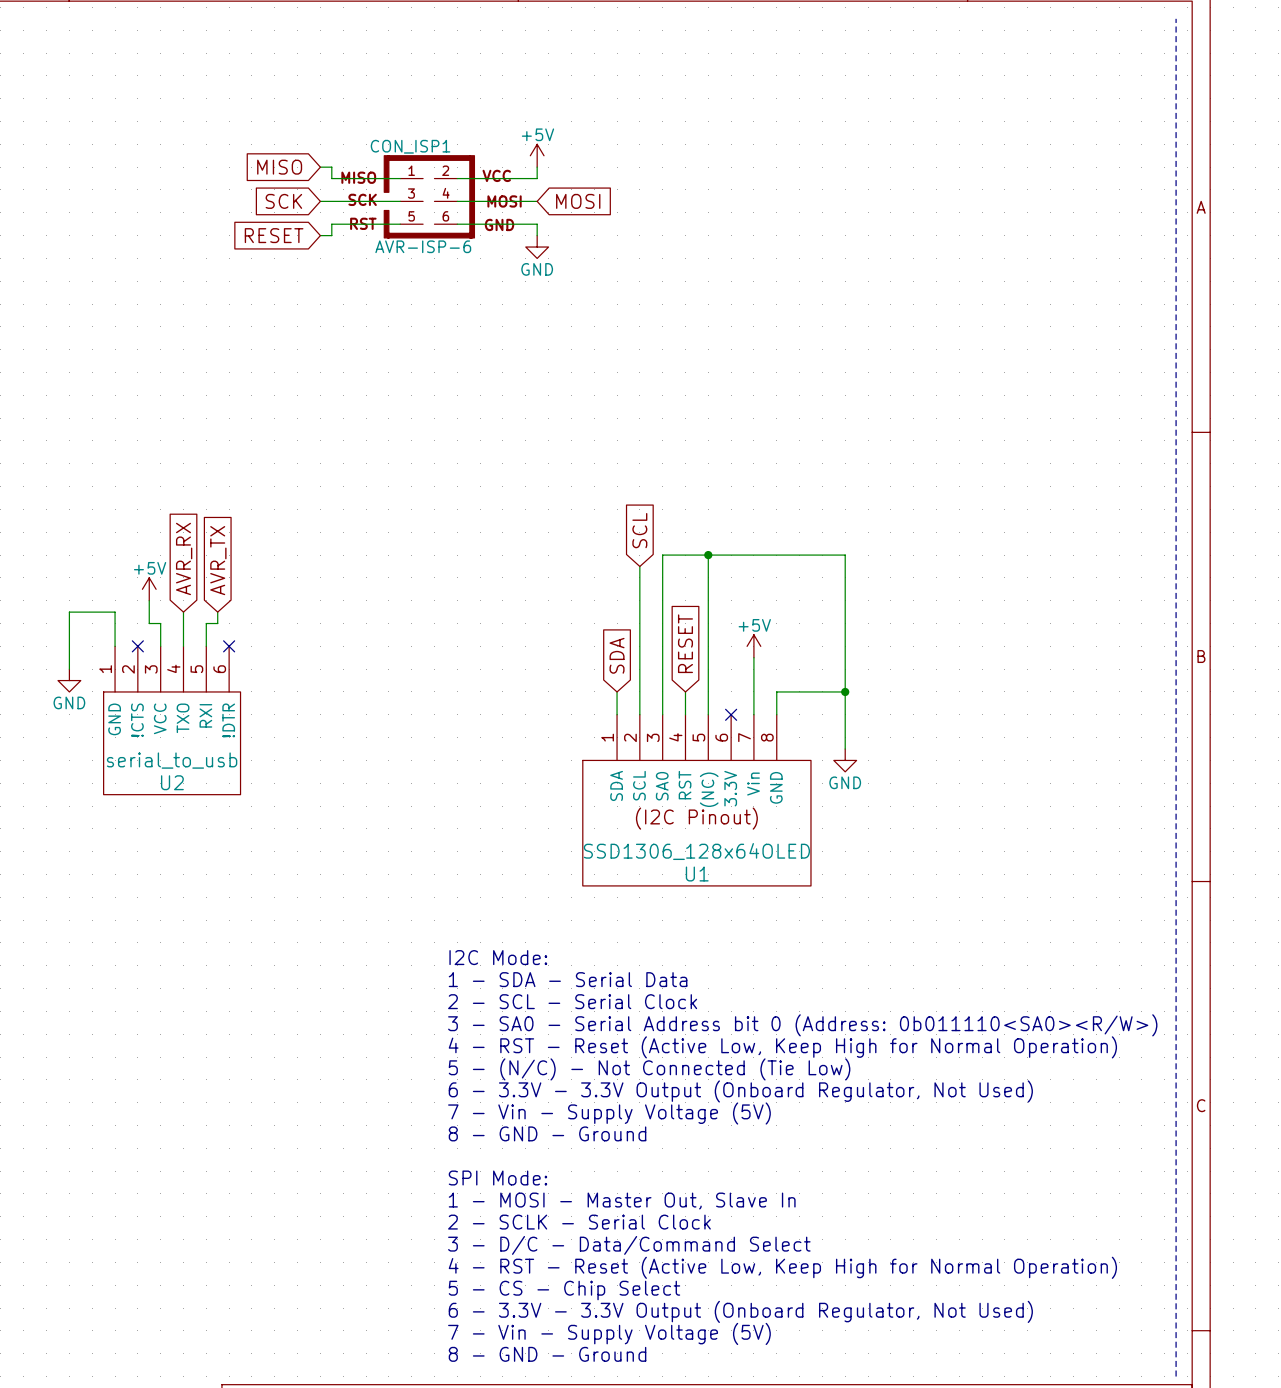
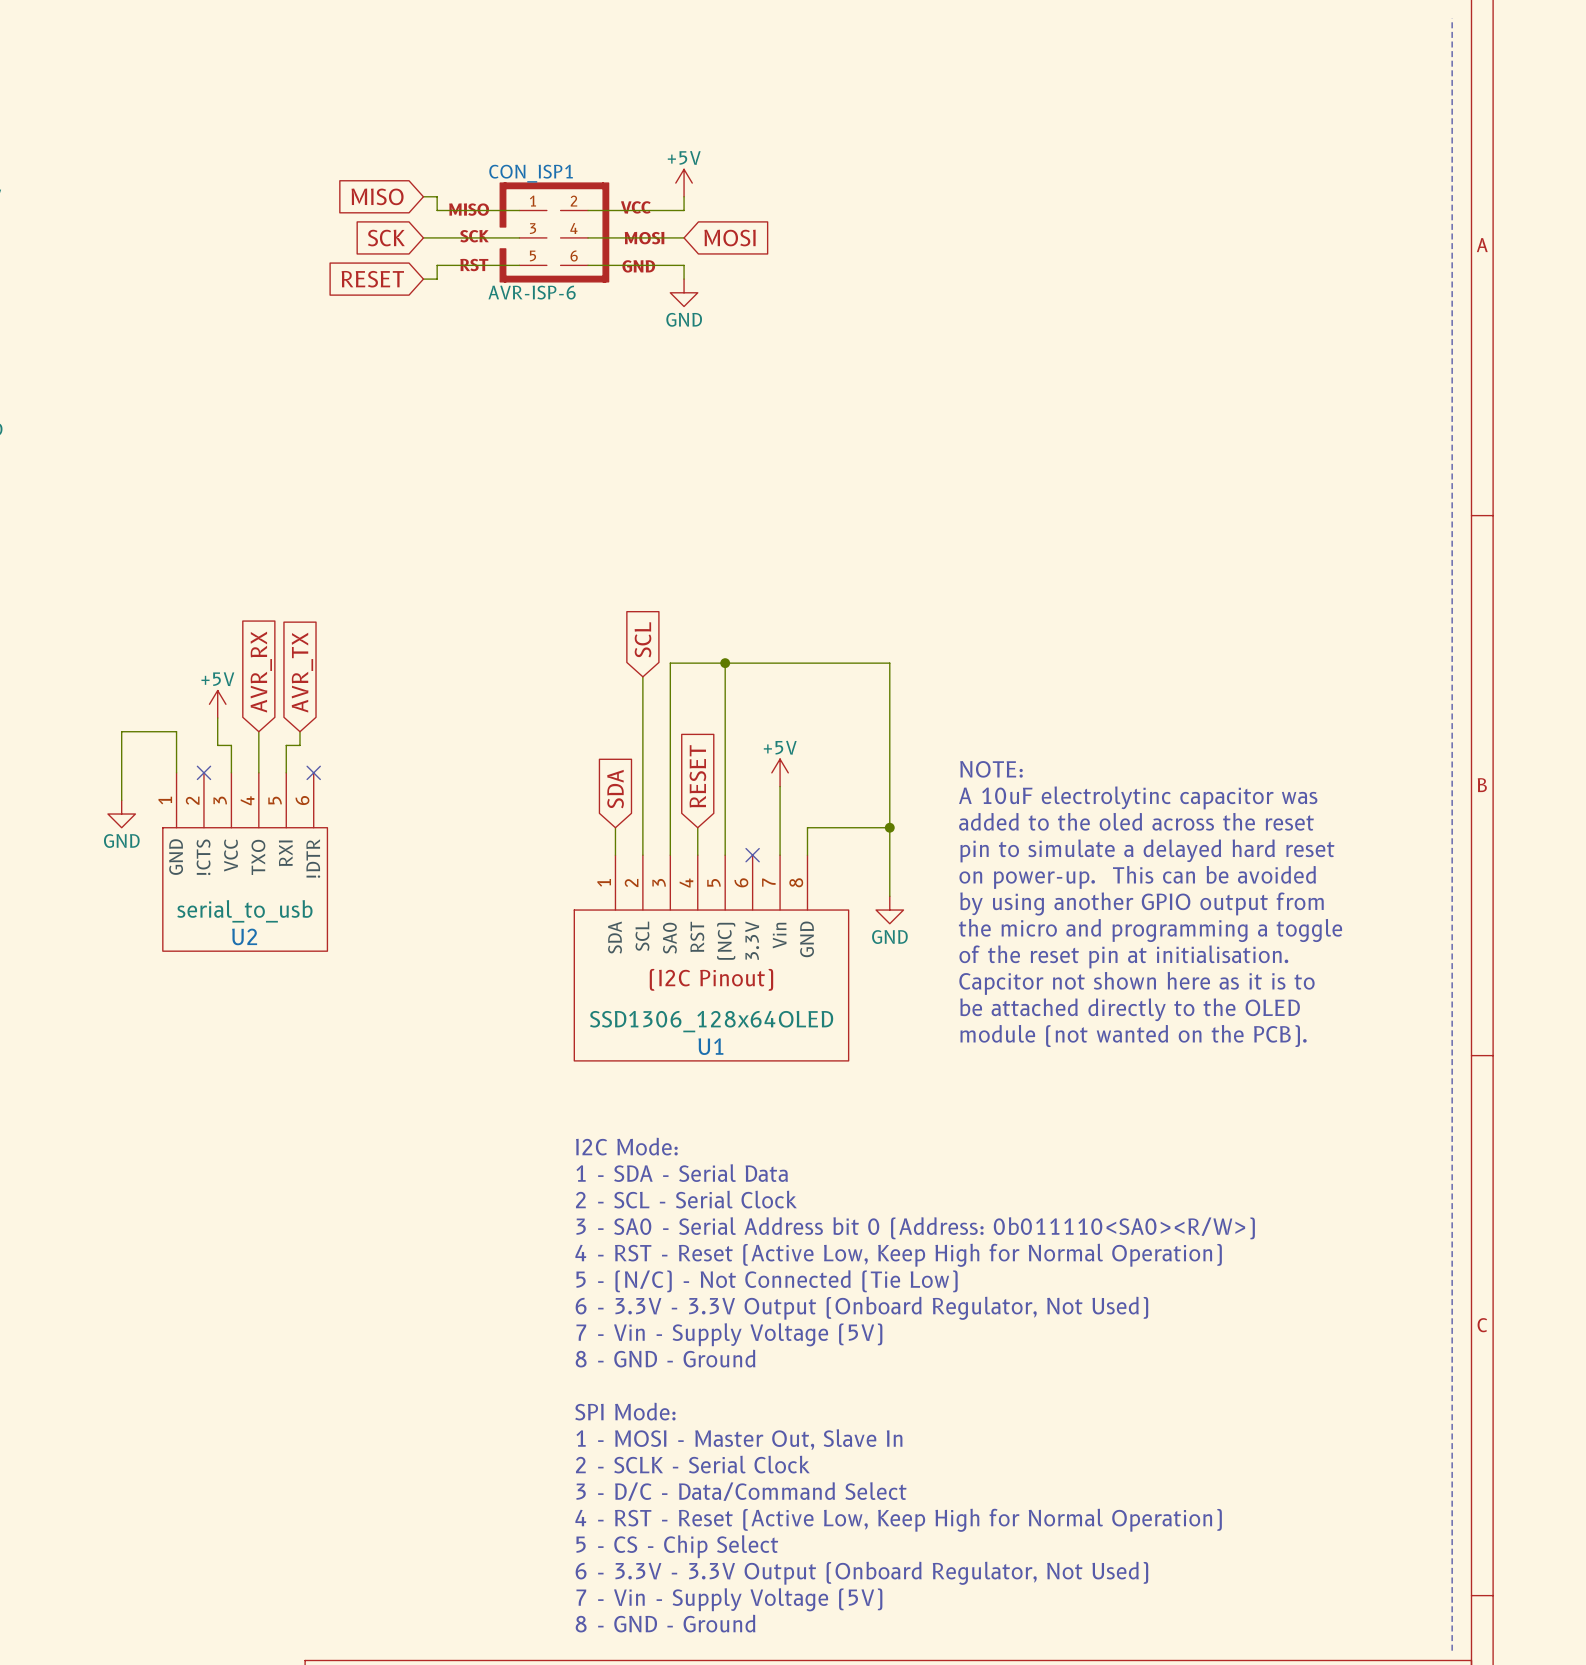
global label position: SCL (639, 530) -> SCL (642, 639)
wire: none -> (725, 663) (725, 855)
junction: none -> (725, 663)
wire: (662, 555) (662, 714) -> (834, 663) (670, 663) (670, 855)
wire: (708, 555) (845, 555) (845, 749) -> none
junction: (708, 555) -> none
wire: none -> (642, 676) (642, 855)
wire: (639, 566) (639, 691) -> (889, 827) (807, 827)
global label position: RESET (685, 643) -> RESET (697, 776)
text: none -> NOTE: (991, 769)
power symbol position: +5V (753, 646) -> +5V (780, 772)
global label position: SDA (617, 655) -> SDA (615, 789)
wire: none -> (780, 786) (780, 827)
wire: (753, 657) (753, 714) -> none
text: none -> A 10uF electrolytinc capacitor was (1138, 797)
text: none -> added to the oled across the reset (1136, 821)
wire: none -> (615, 827) (615, 855)
wire: (685, 691) (685, 714) -> (697, 827) (697, 855)
junction: none -> (889, 827)
wire: (845, 691) (776, 691) (776, 714) -> none
junction: (845, 691) -> none
text: none -> pin to simulate a delayed hard reset (1147, 850)
no-connect mark: none -> (752, 855)
no-connect mark: (731, 714) -> none
text: none -> on power-up. This can be avoided (1137, 877)
text: none -> by using another GPIO output from (1142, 904)
power symbol position: GND (845, 760) -> GND (889, 910)
text: none -> the micro and programming a toggle (1150, 930)
text: none -> of the reset pin at initialisation. (1123, 956)
U1 position: (696, 800) -> (711, 958)
text: none -> Capcitor not shown here as it is to (1136, 983)
text: none -> be attached directly to the OLED (1130, 1009)
text: none -> module (not wanted on the PCB). (1133, 1035)

